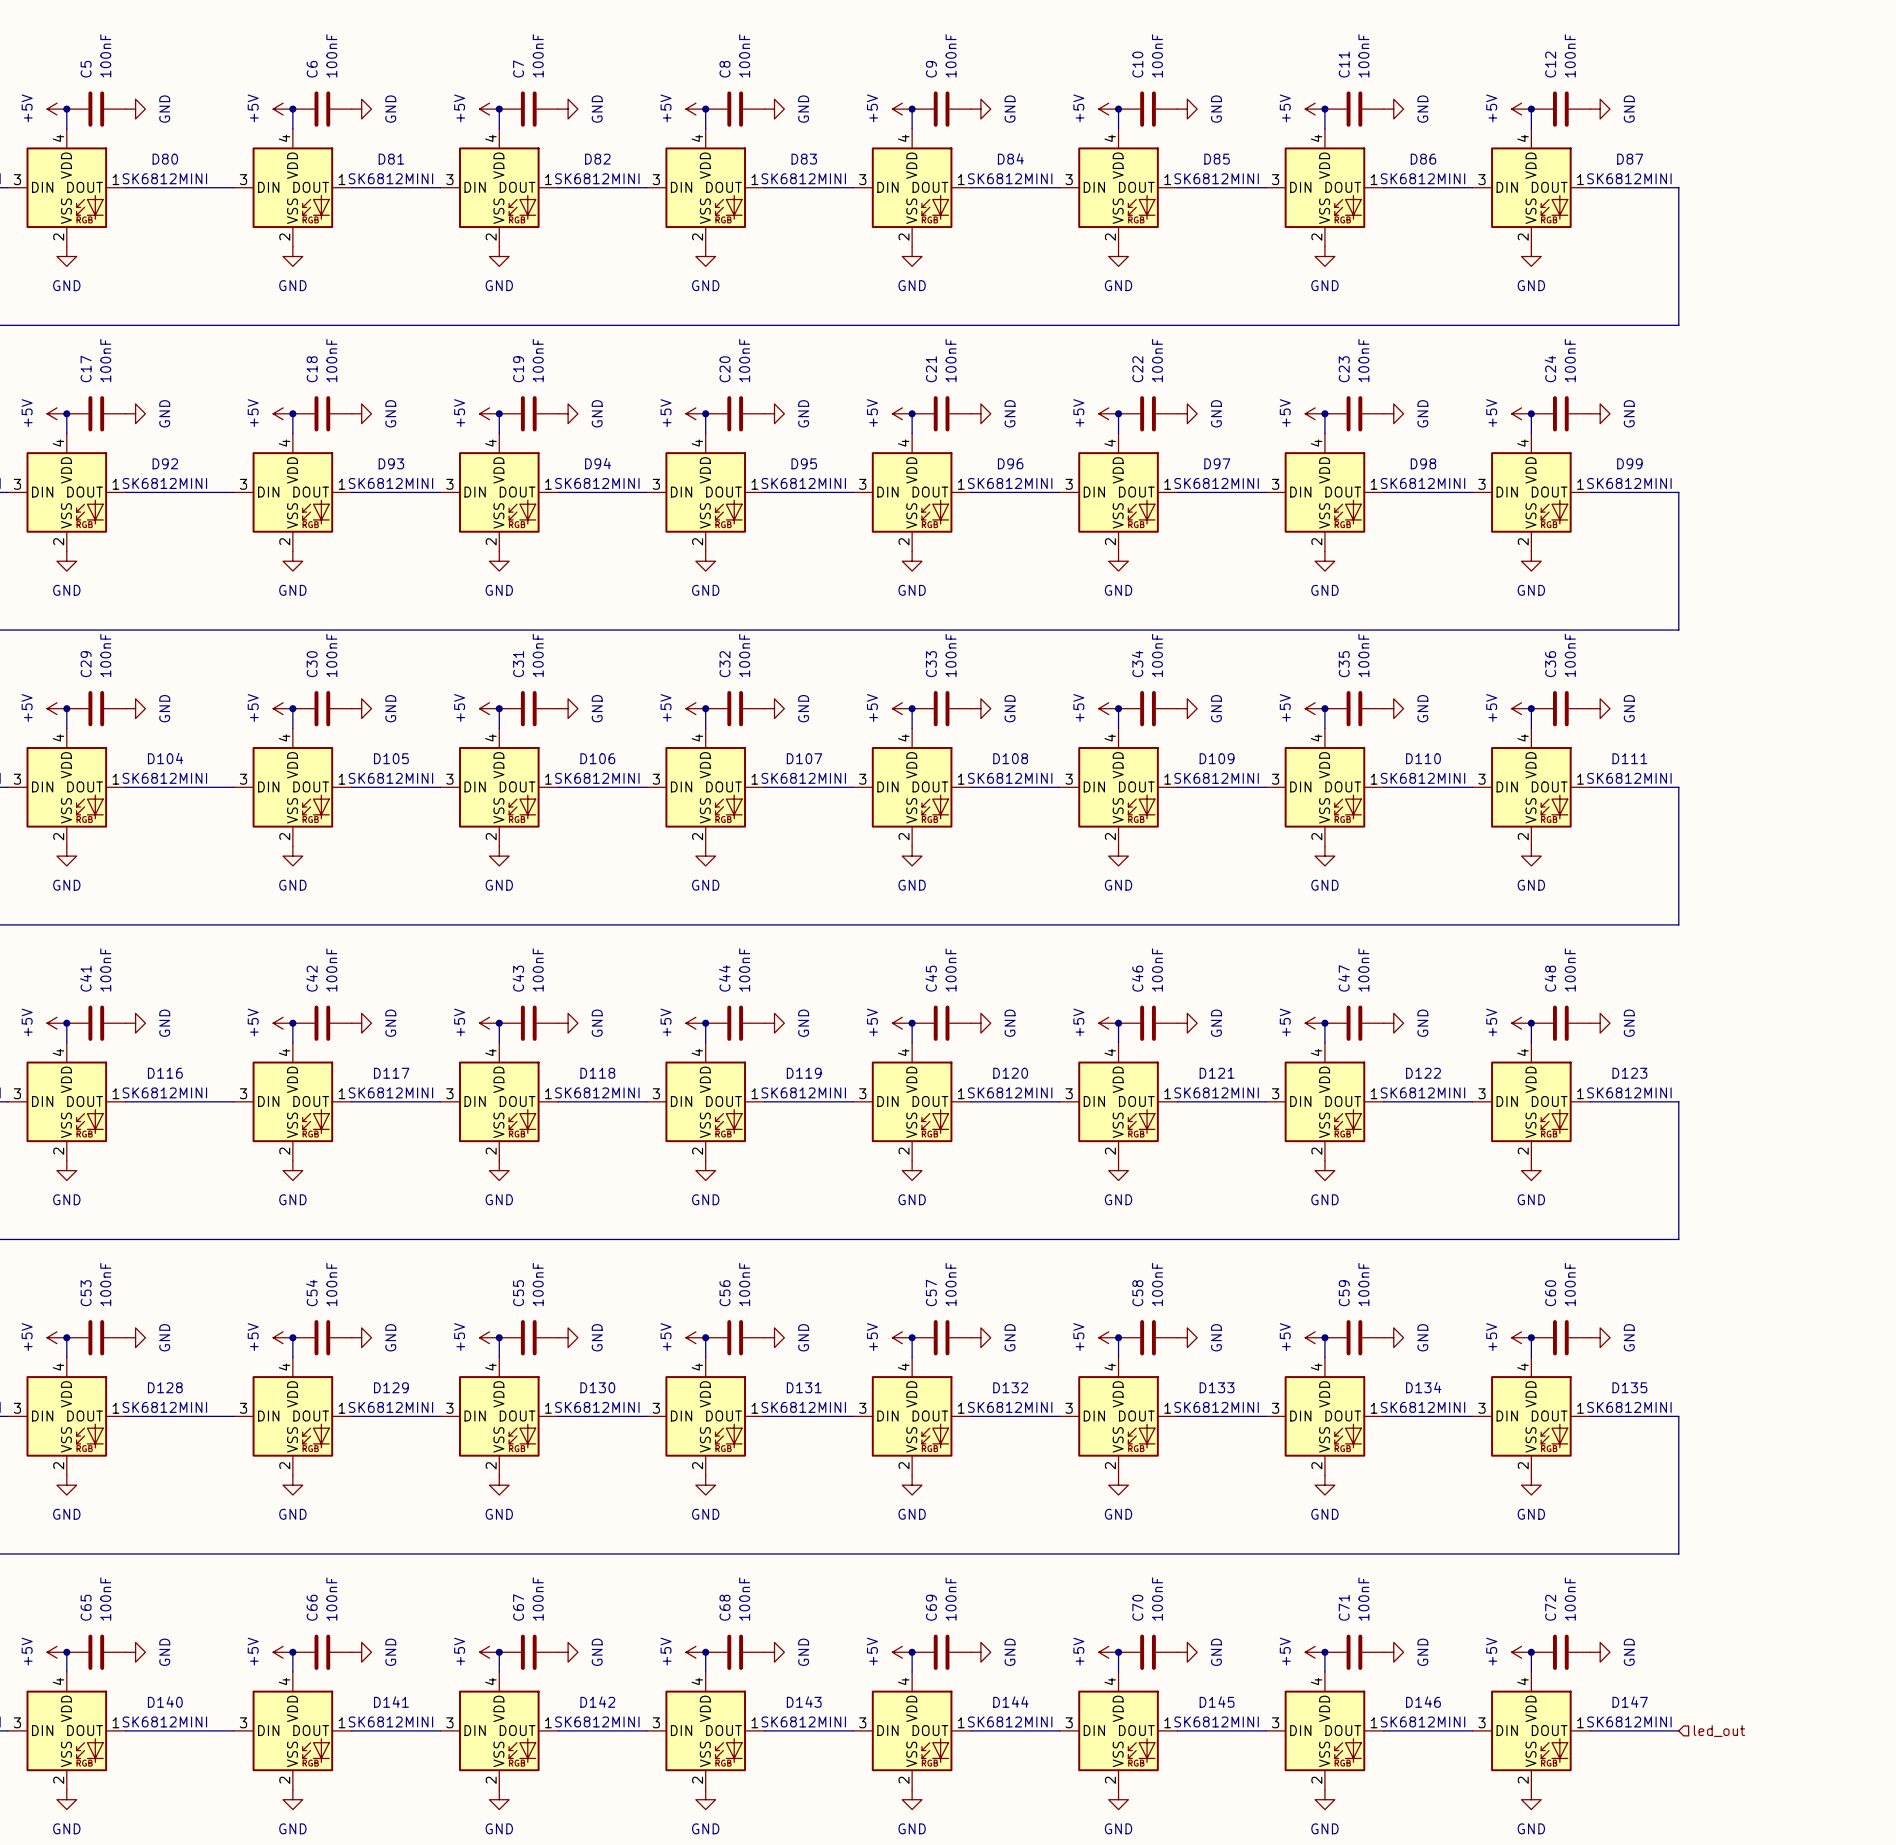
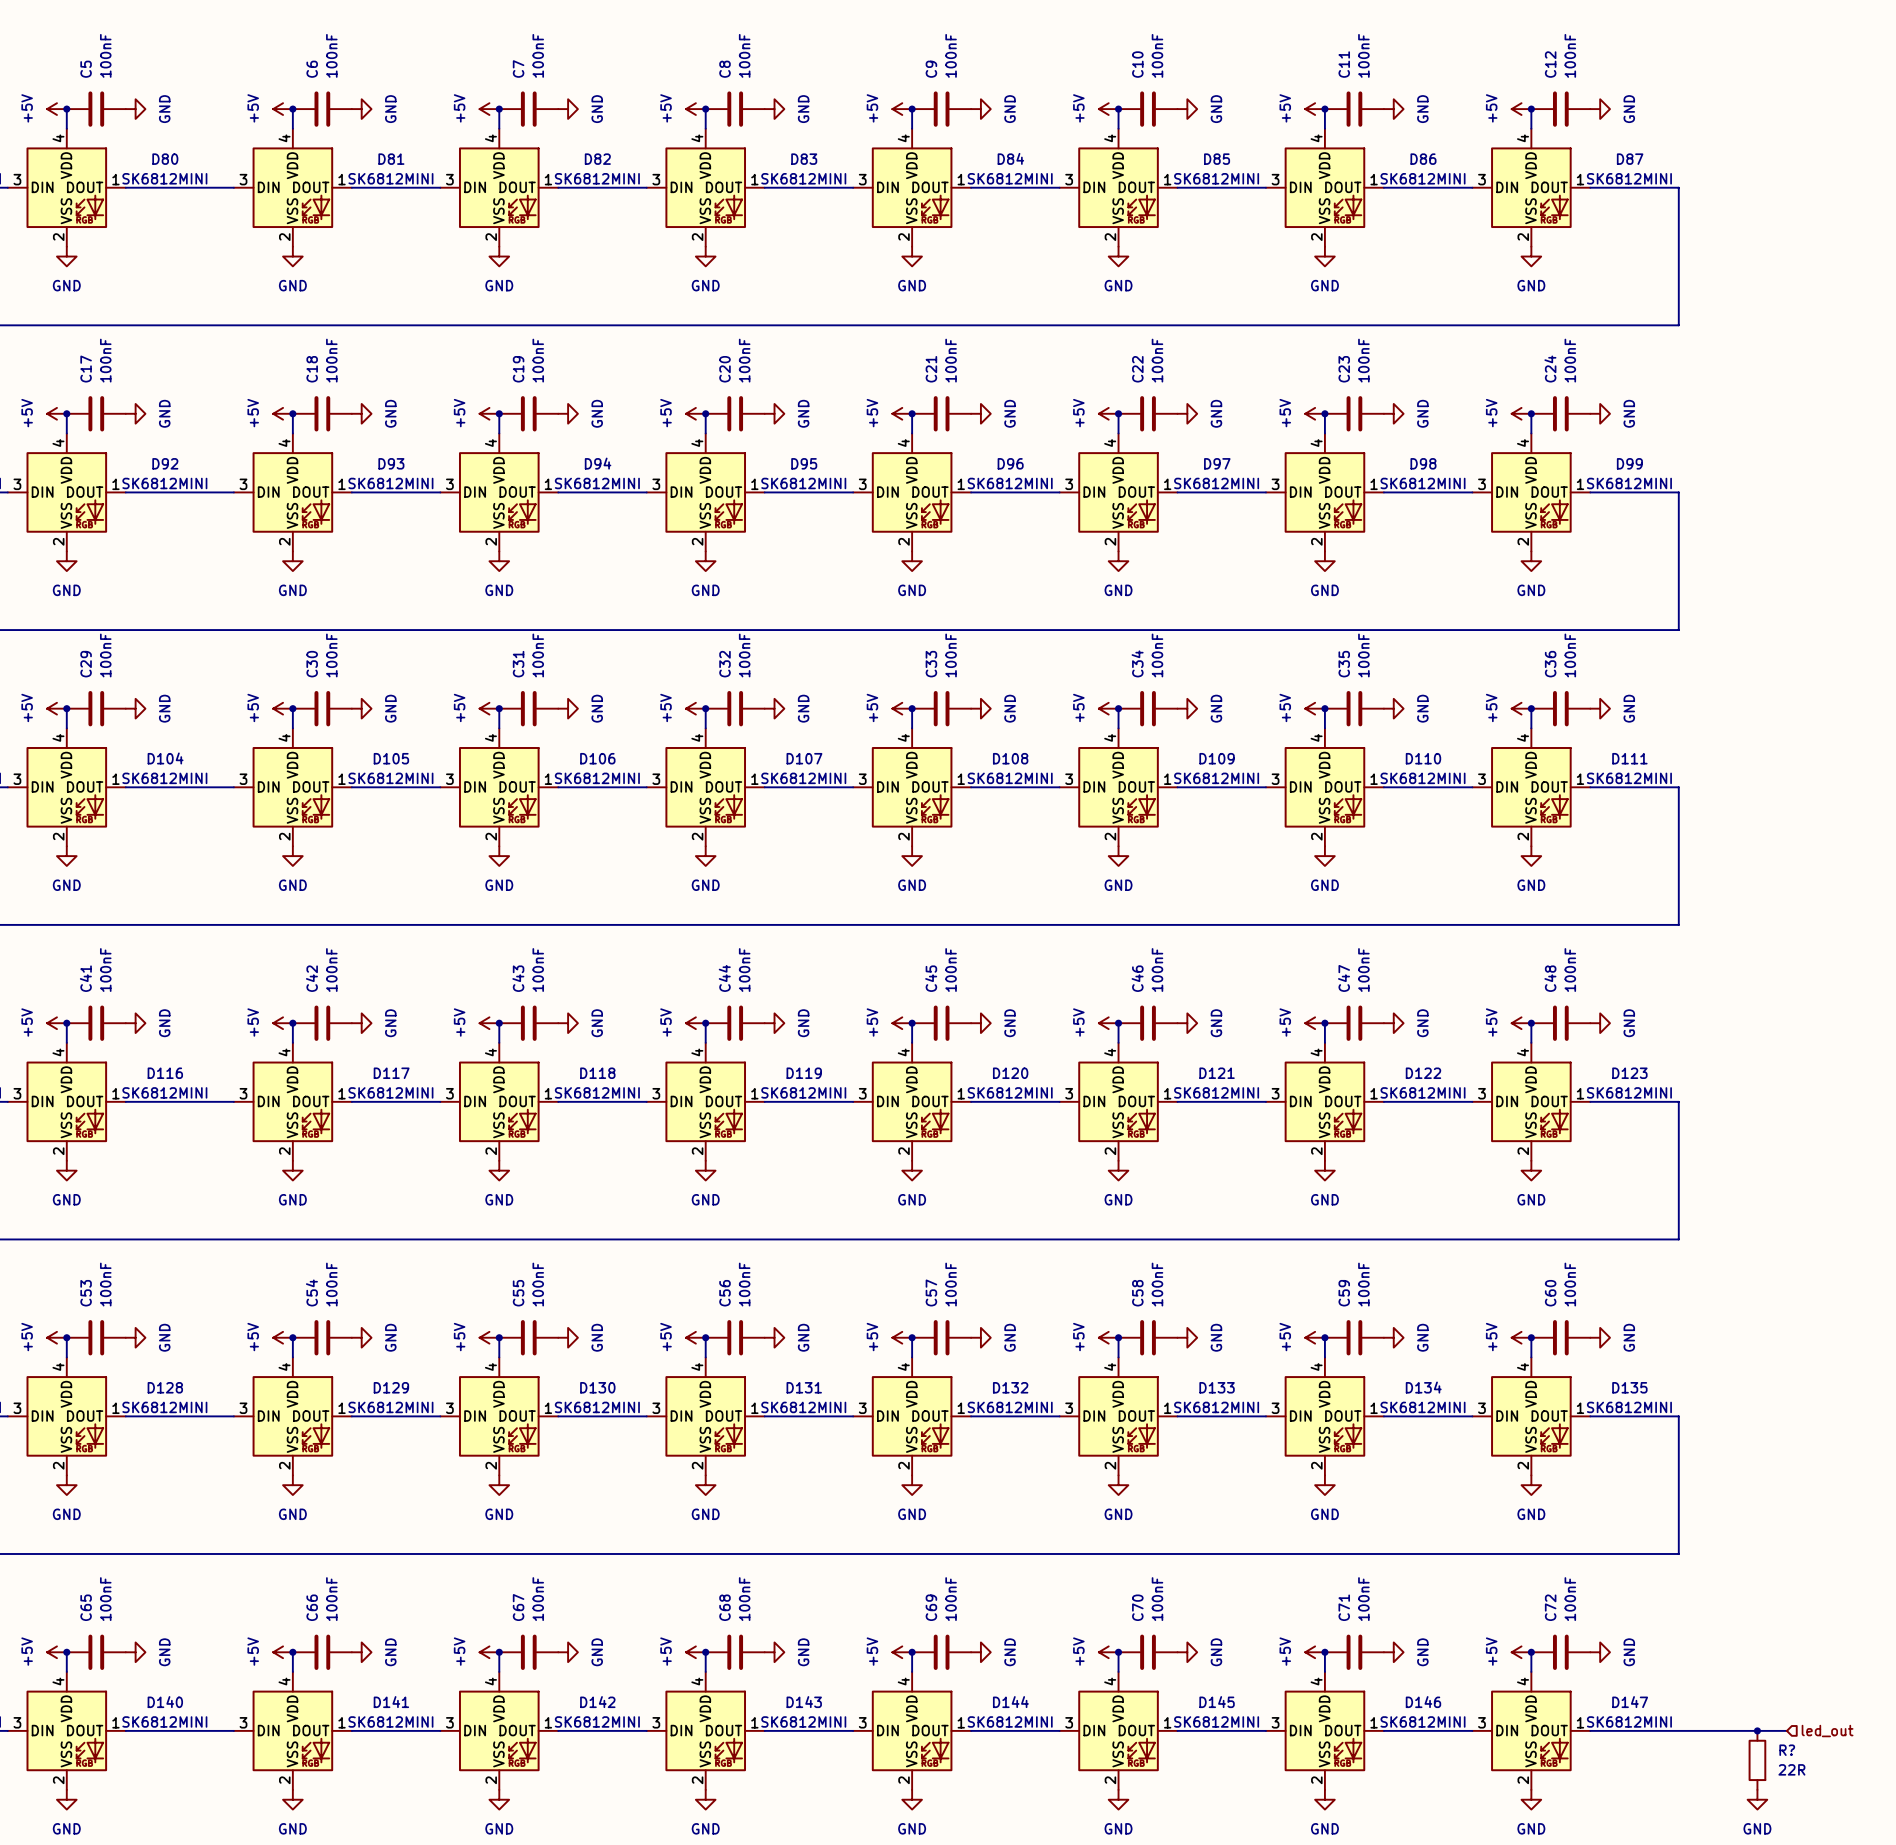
wire: none -> (1678, 1730) (1786, 1730)
junction: none -> (1757, 1730)
hierarchical label position: led_out (1719, 1731) -> led_out (1827, 1731)
R?: none -> 22R (1757, 1760)
power symbol: none -> GND (1757, 1799)

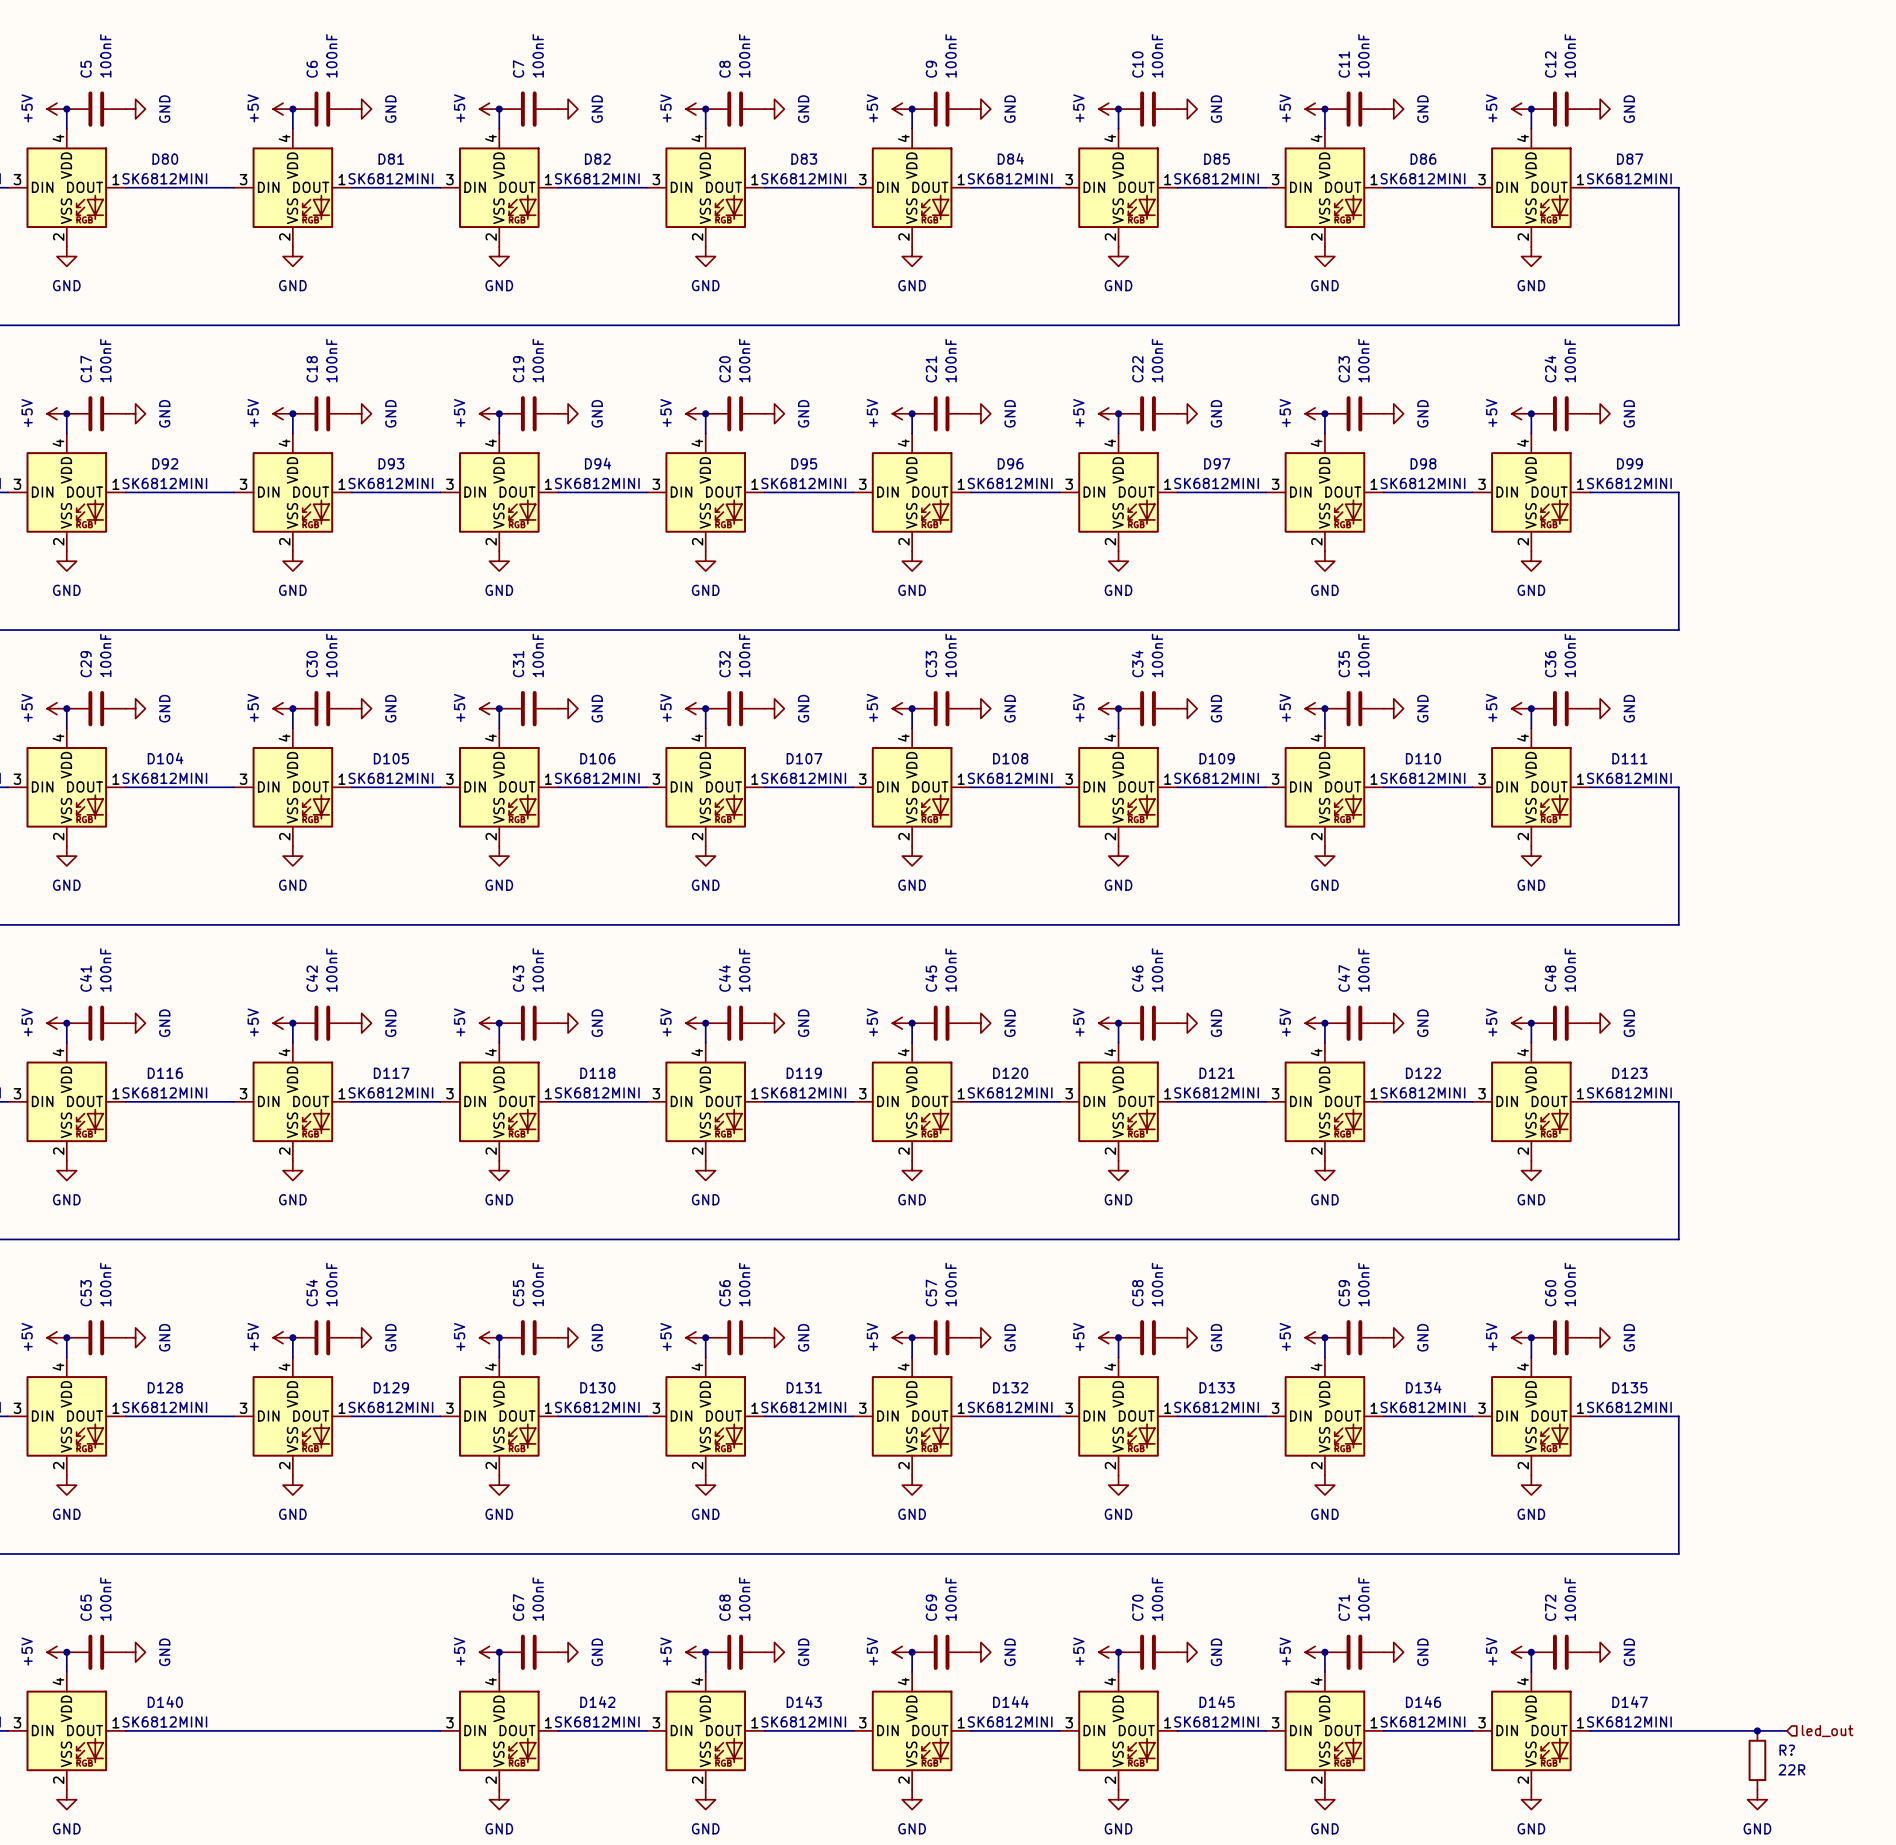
power symbol: +5V (283, 1652) -> none
wire: (292, 1652) (292, 1671) -> none
junction: (292, 1652) -> none
C66: 100nF (322, 1652) -> none
power symbol: GND (361, 1652) -> none
D141: SK6812MINI (292, 1730) -> none
power symbol: GND (292, 1799) -> none

